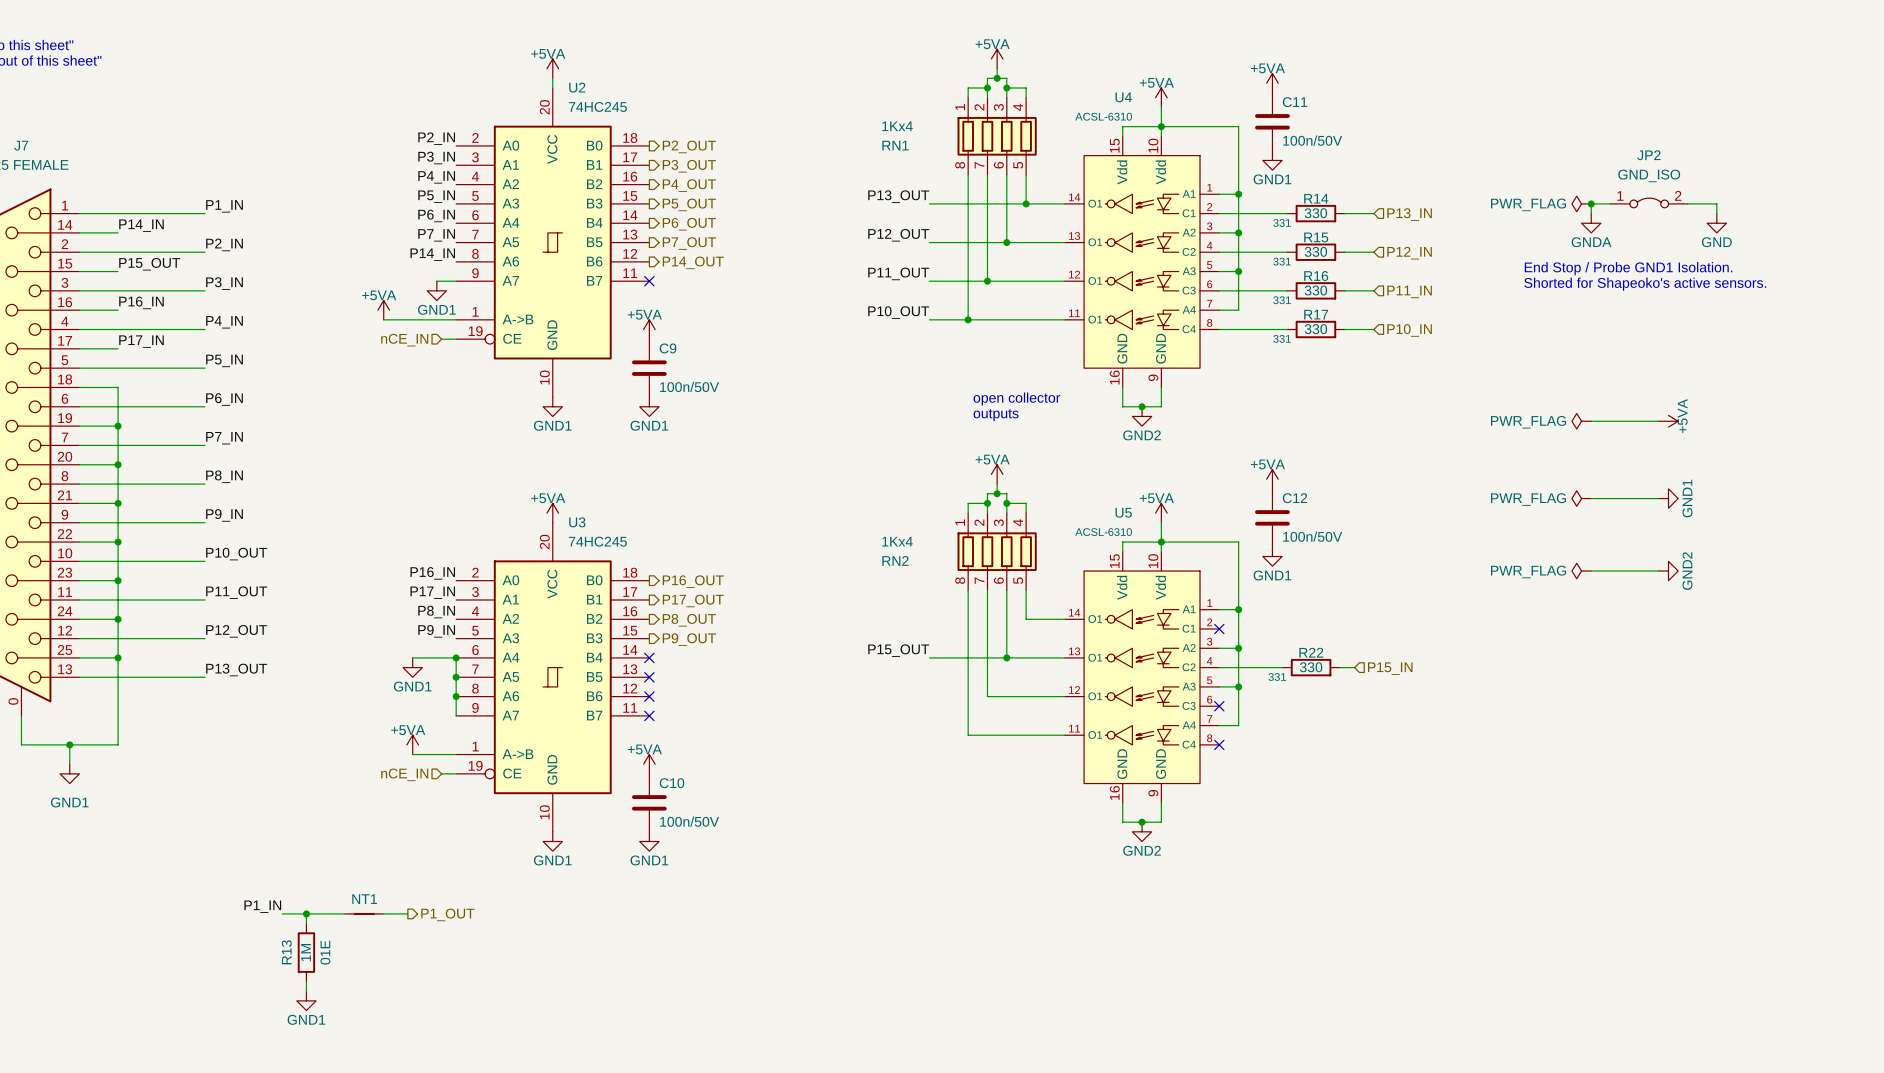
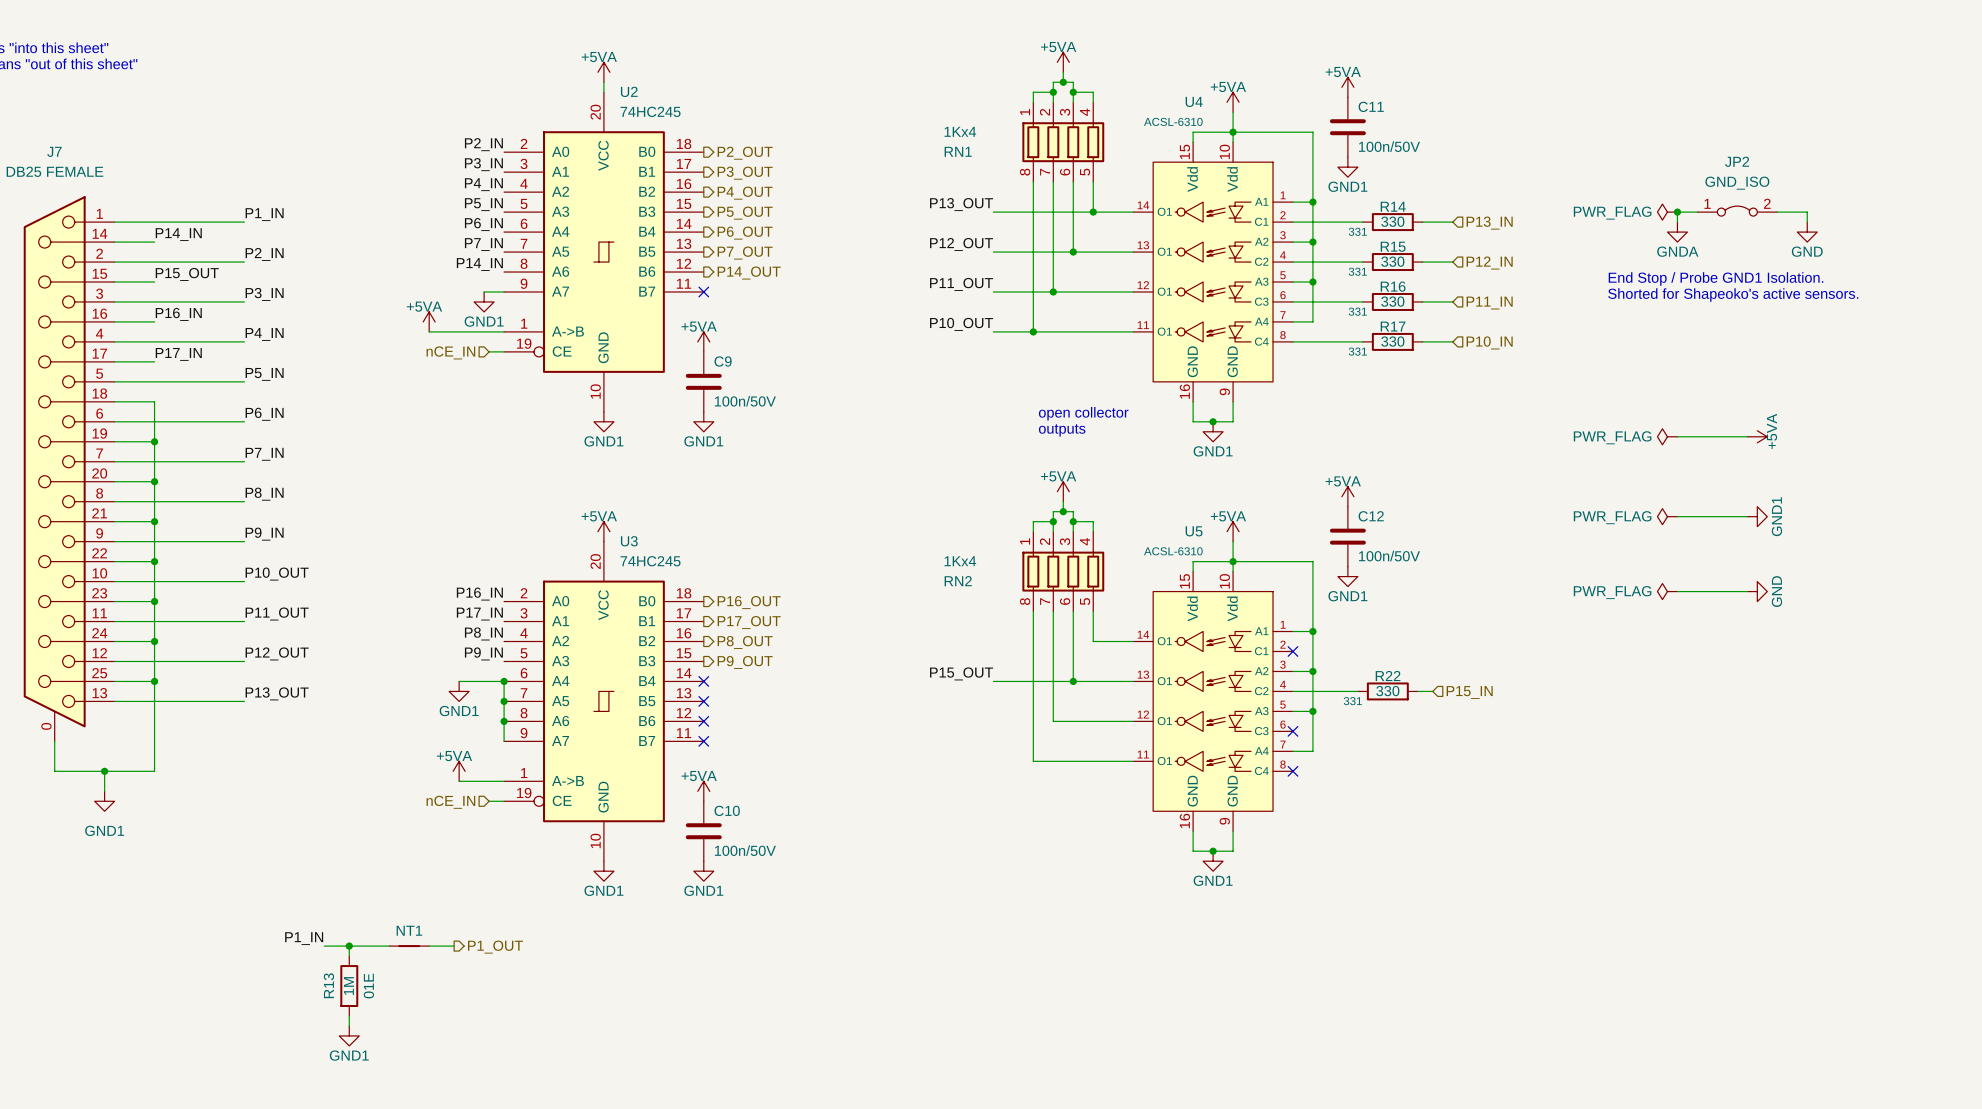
power symbol: GND2 (1142, 416) -> GND1 (1213, 431)
power symbol: GND2 (1668, 571) -> GND (1757, 591)
power symbol: GND2 (1142, 831) -> GND1 (1213, 861)

